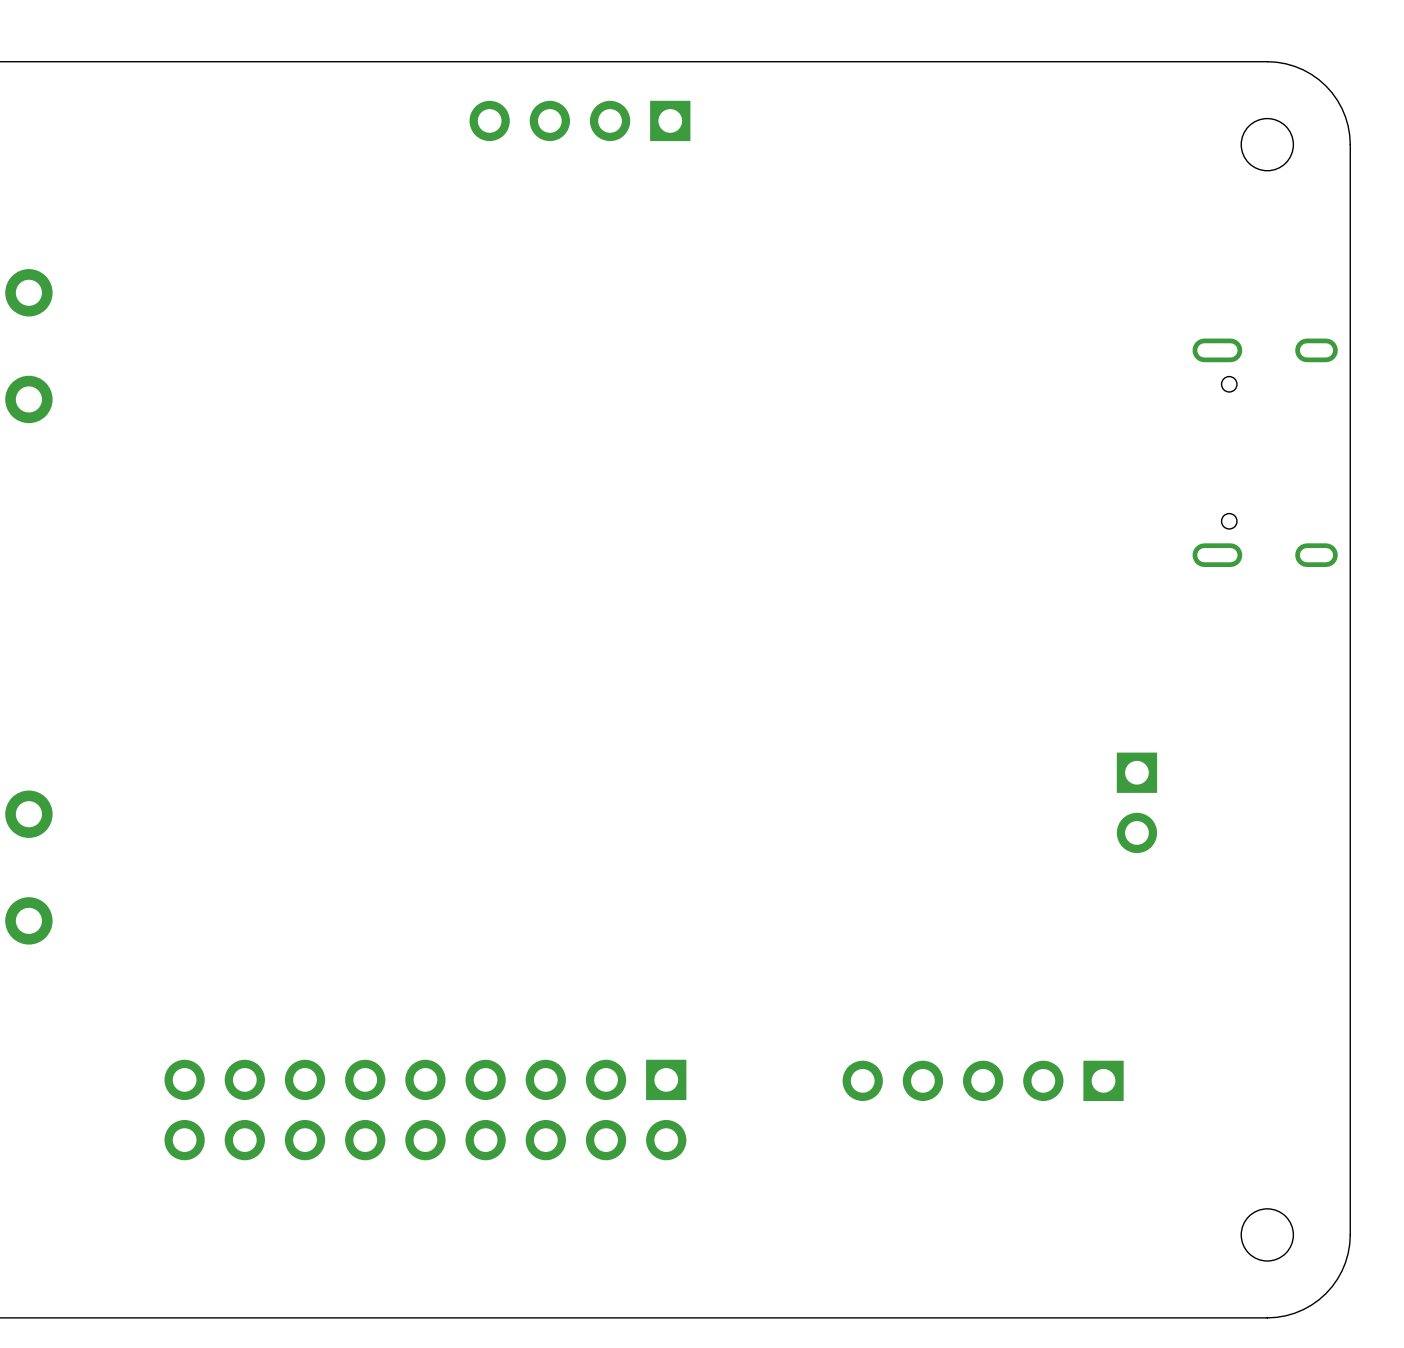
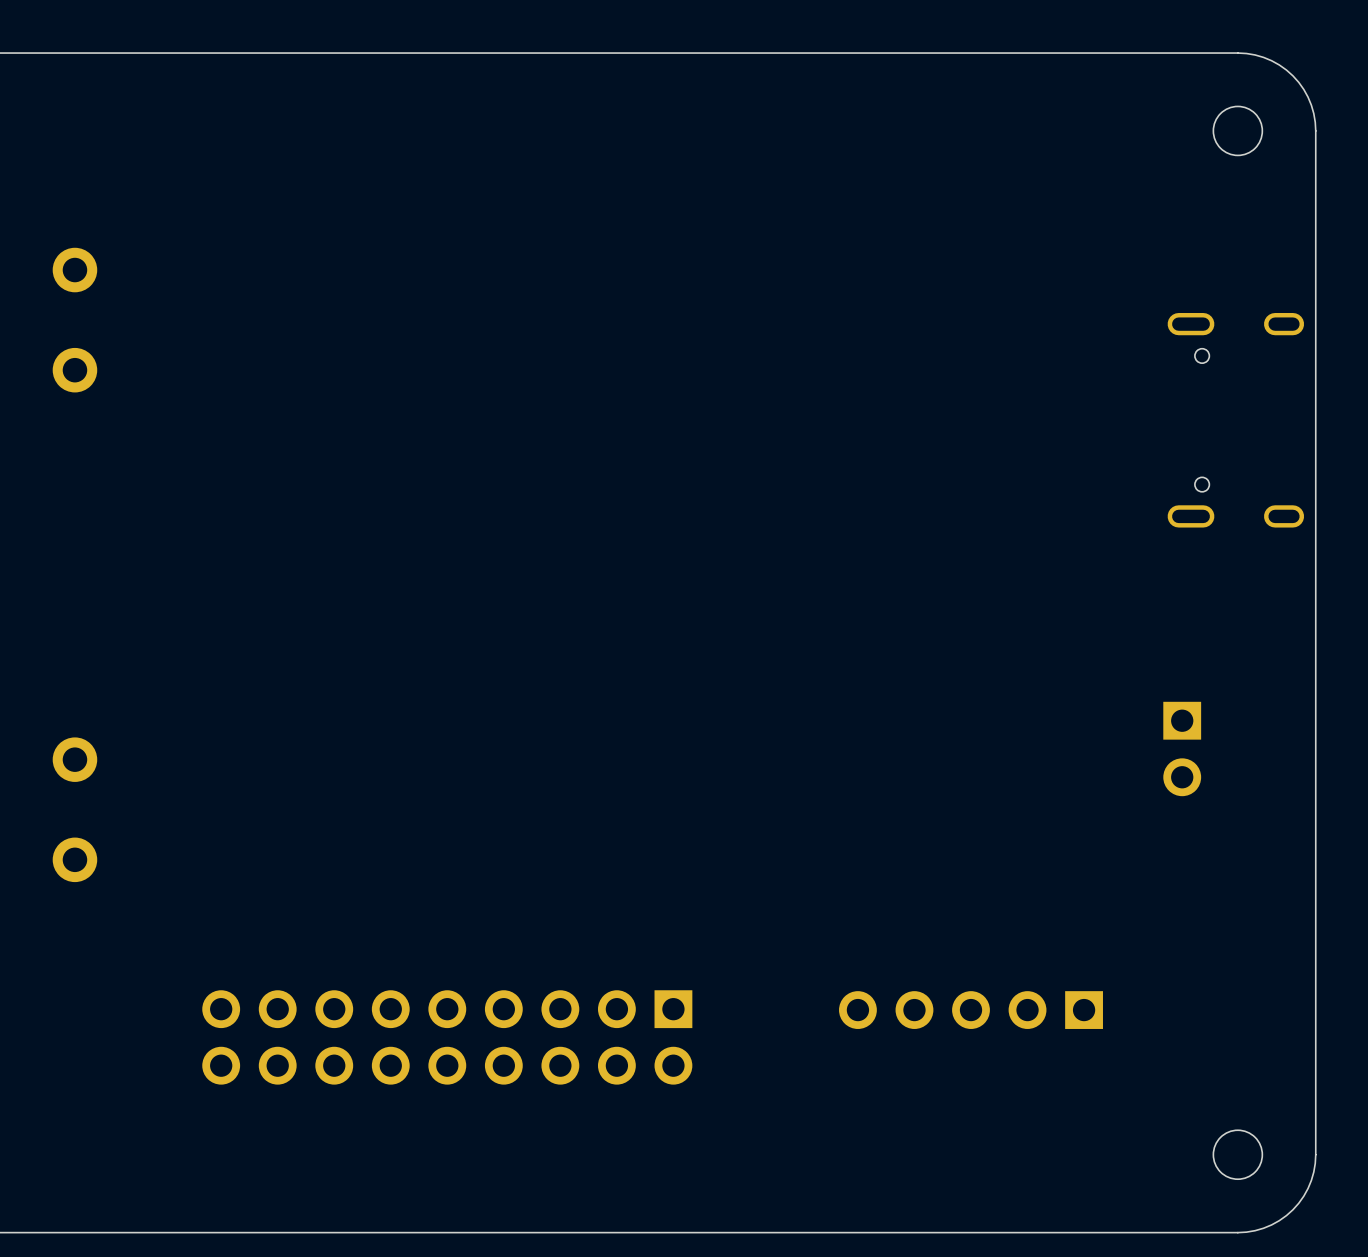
part: (579, 120) -> none
part position: (1136, 802) -> (1182, 748)

